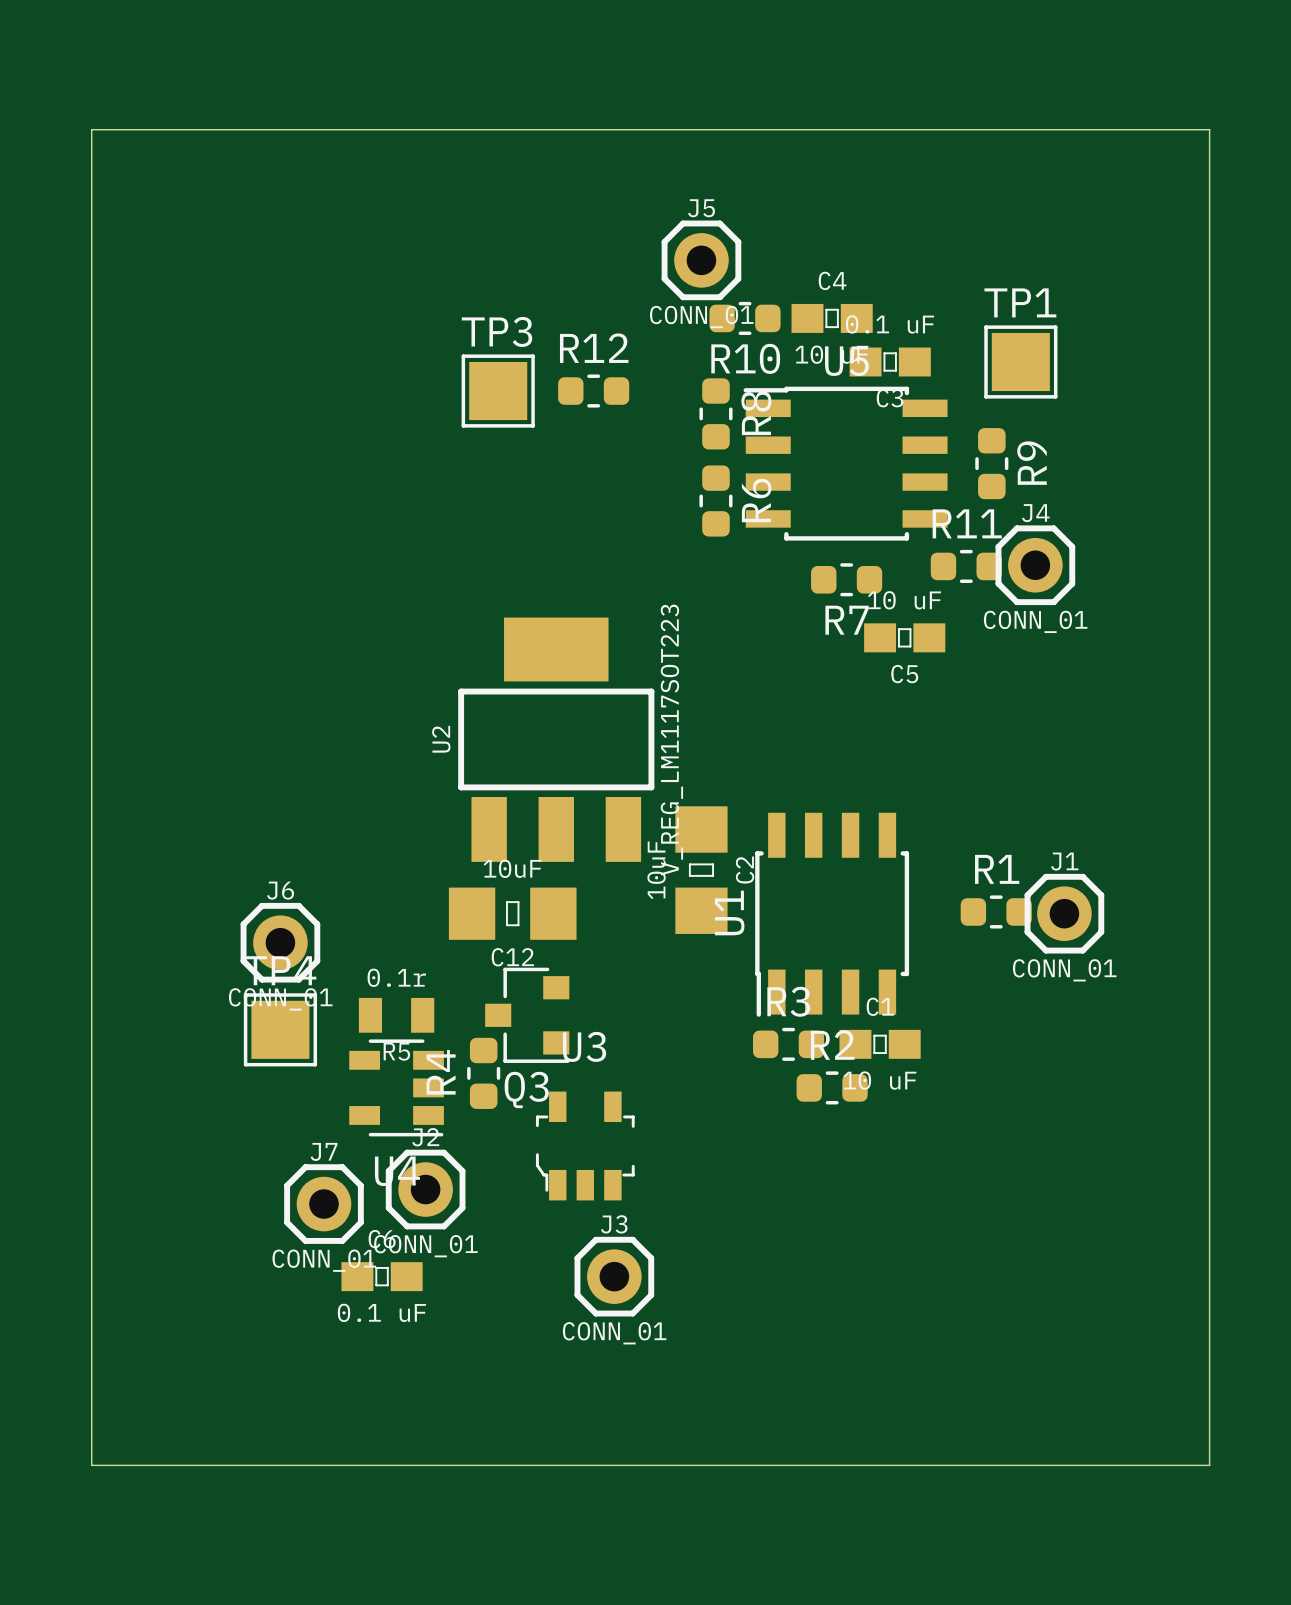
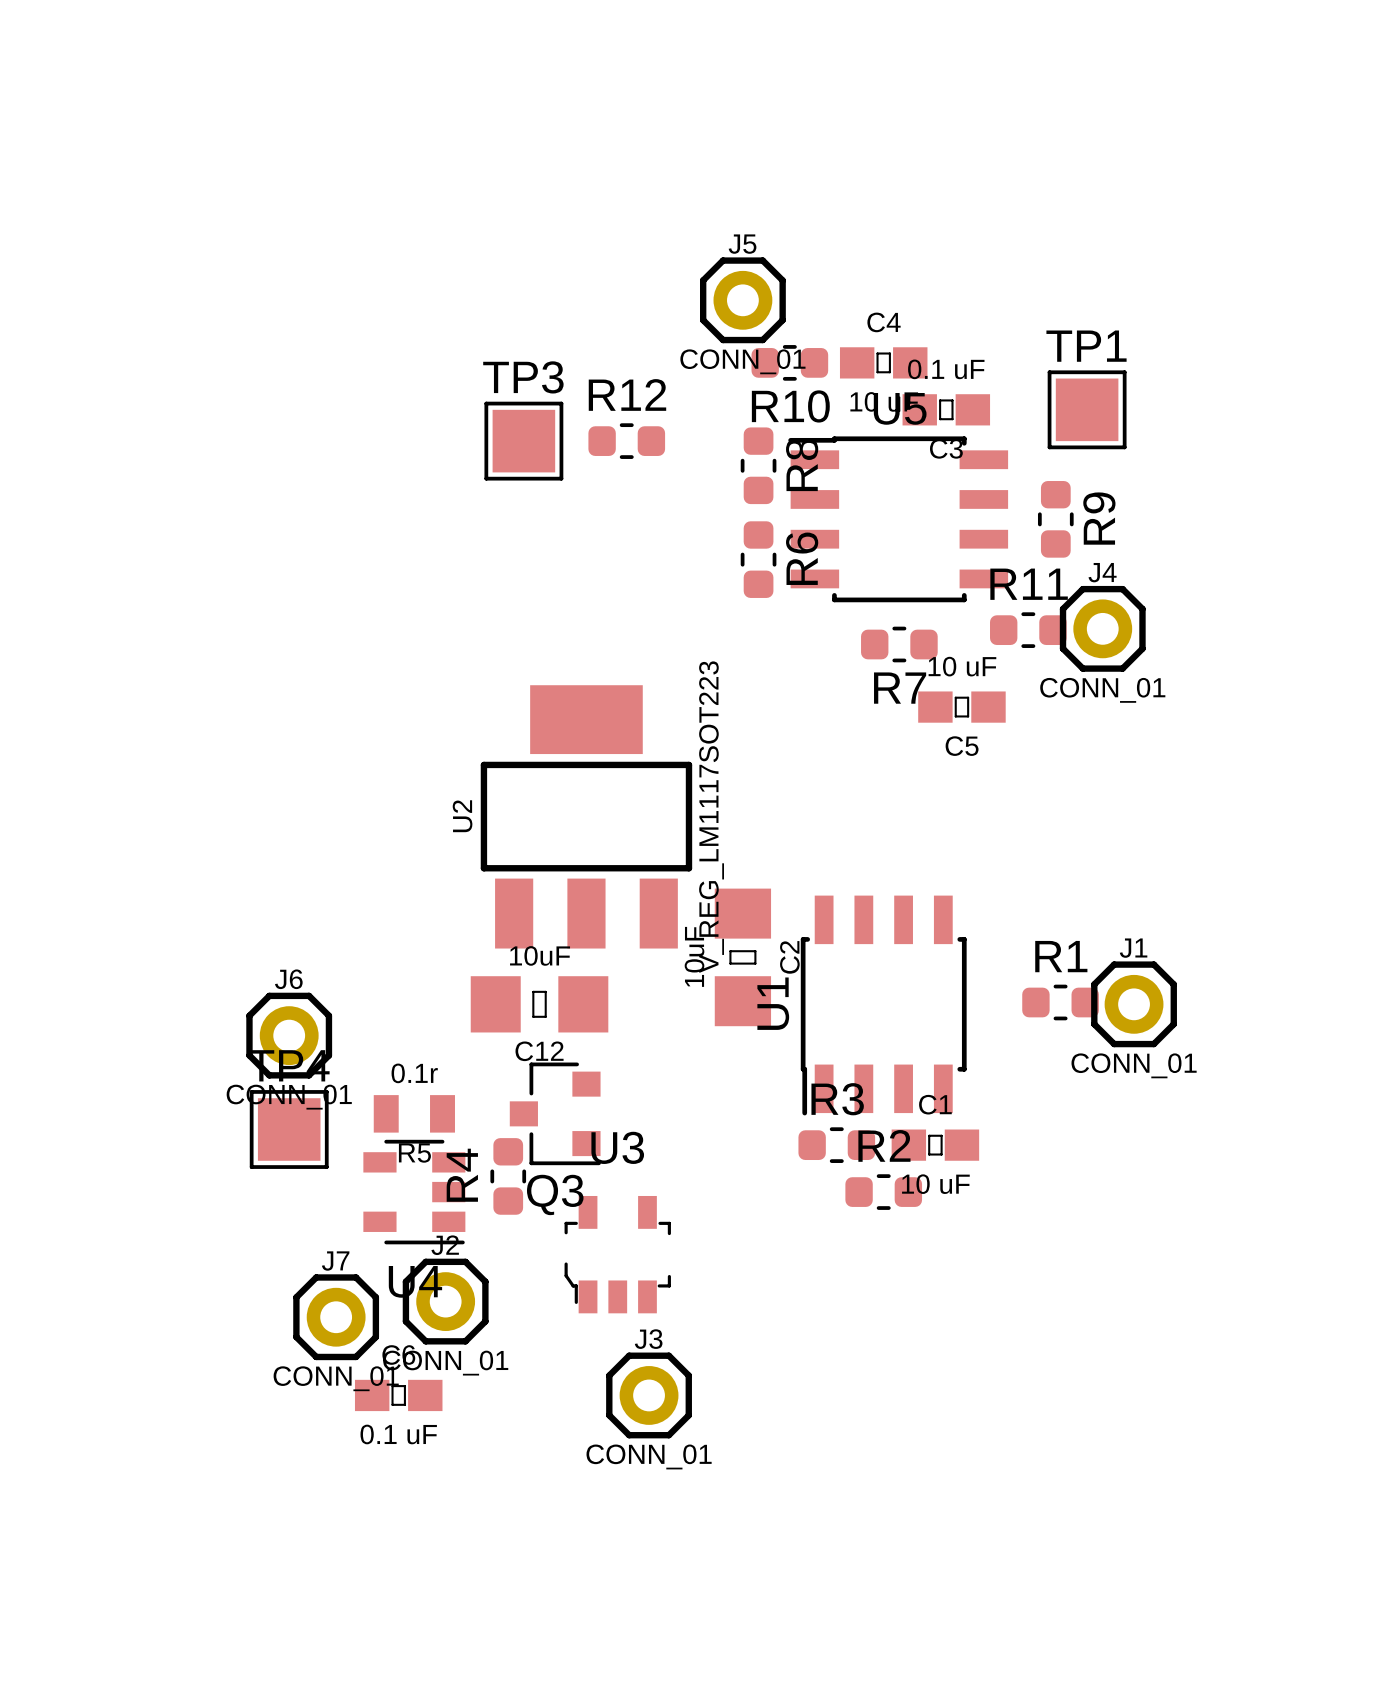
board edge: (91, 129) (1209, 129) (1209, 1465) (91, 1465) (91, 129) -> none

